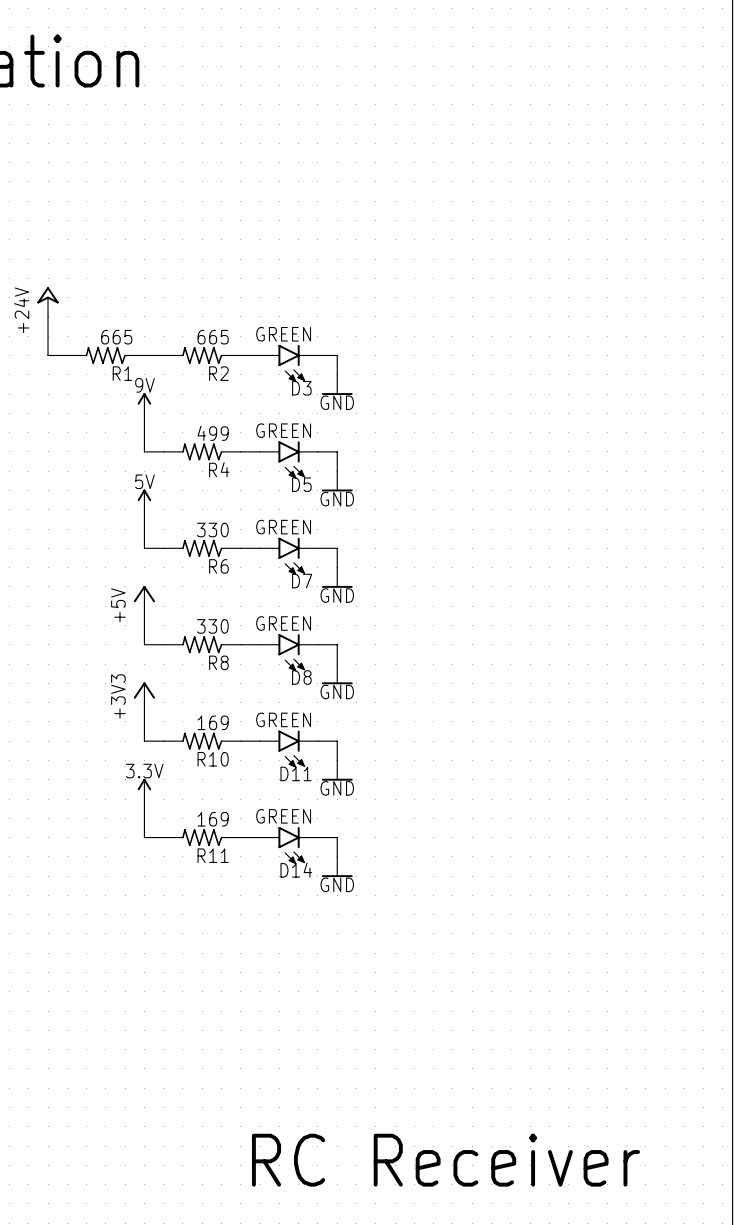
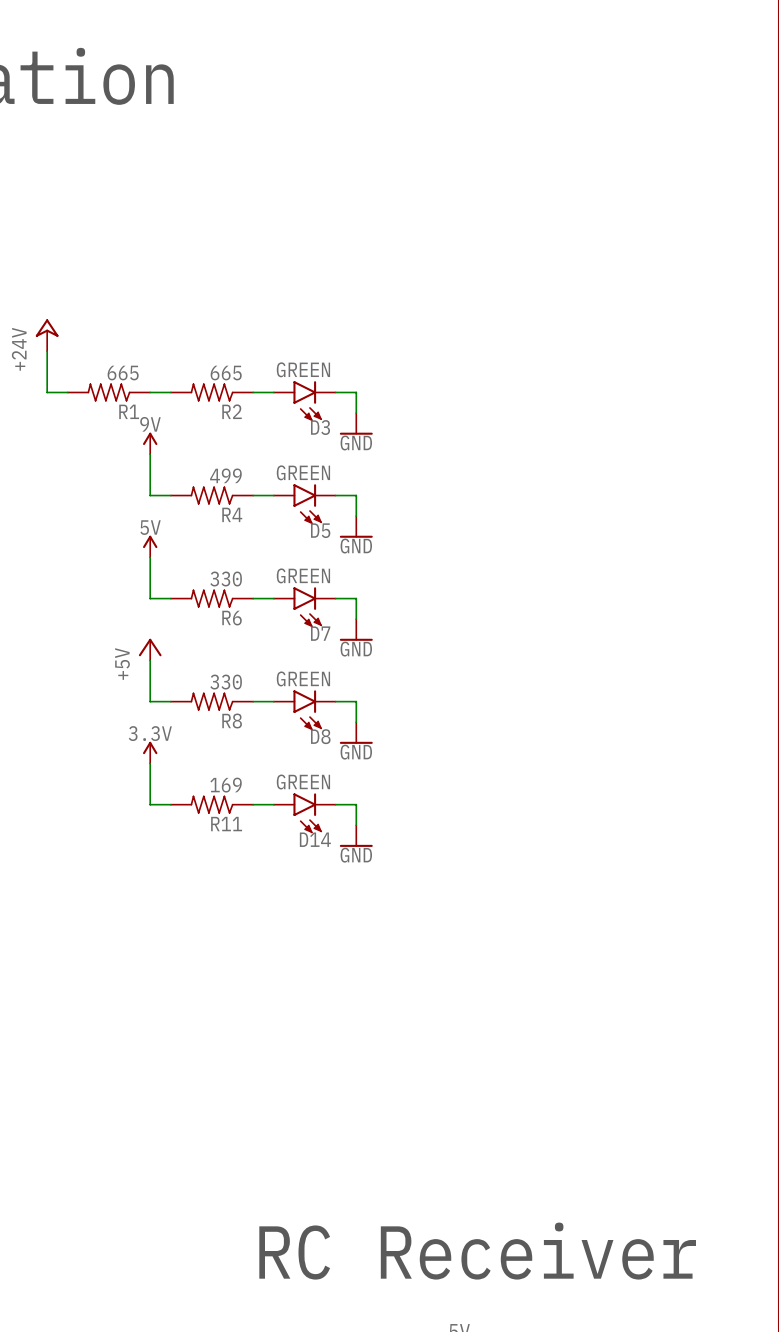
power symbol: +3V3 (144, 692) -> 3.3V (150, 752)
R10 name: R10 (213, 759) -> R11 (226, 824)
D11 name: D11 (296, 773) -> D14 (315, 839)
power symbol: 3.3V (144, 788) -> none
wire: (144, 799) (144, 837) (163, 837) -> none
R11: 169 (202, 837) -> none
wire: (240, 837) (260, 837) -> none
wire: (317, 837) (337, 837) (337, 856) -> none
D14: GREEN (289, 845) -> none
power symbol: GND (337, 866) -> none

